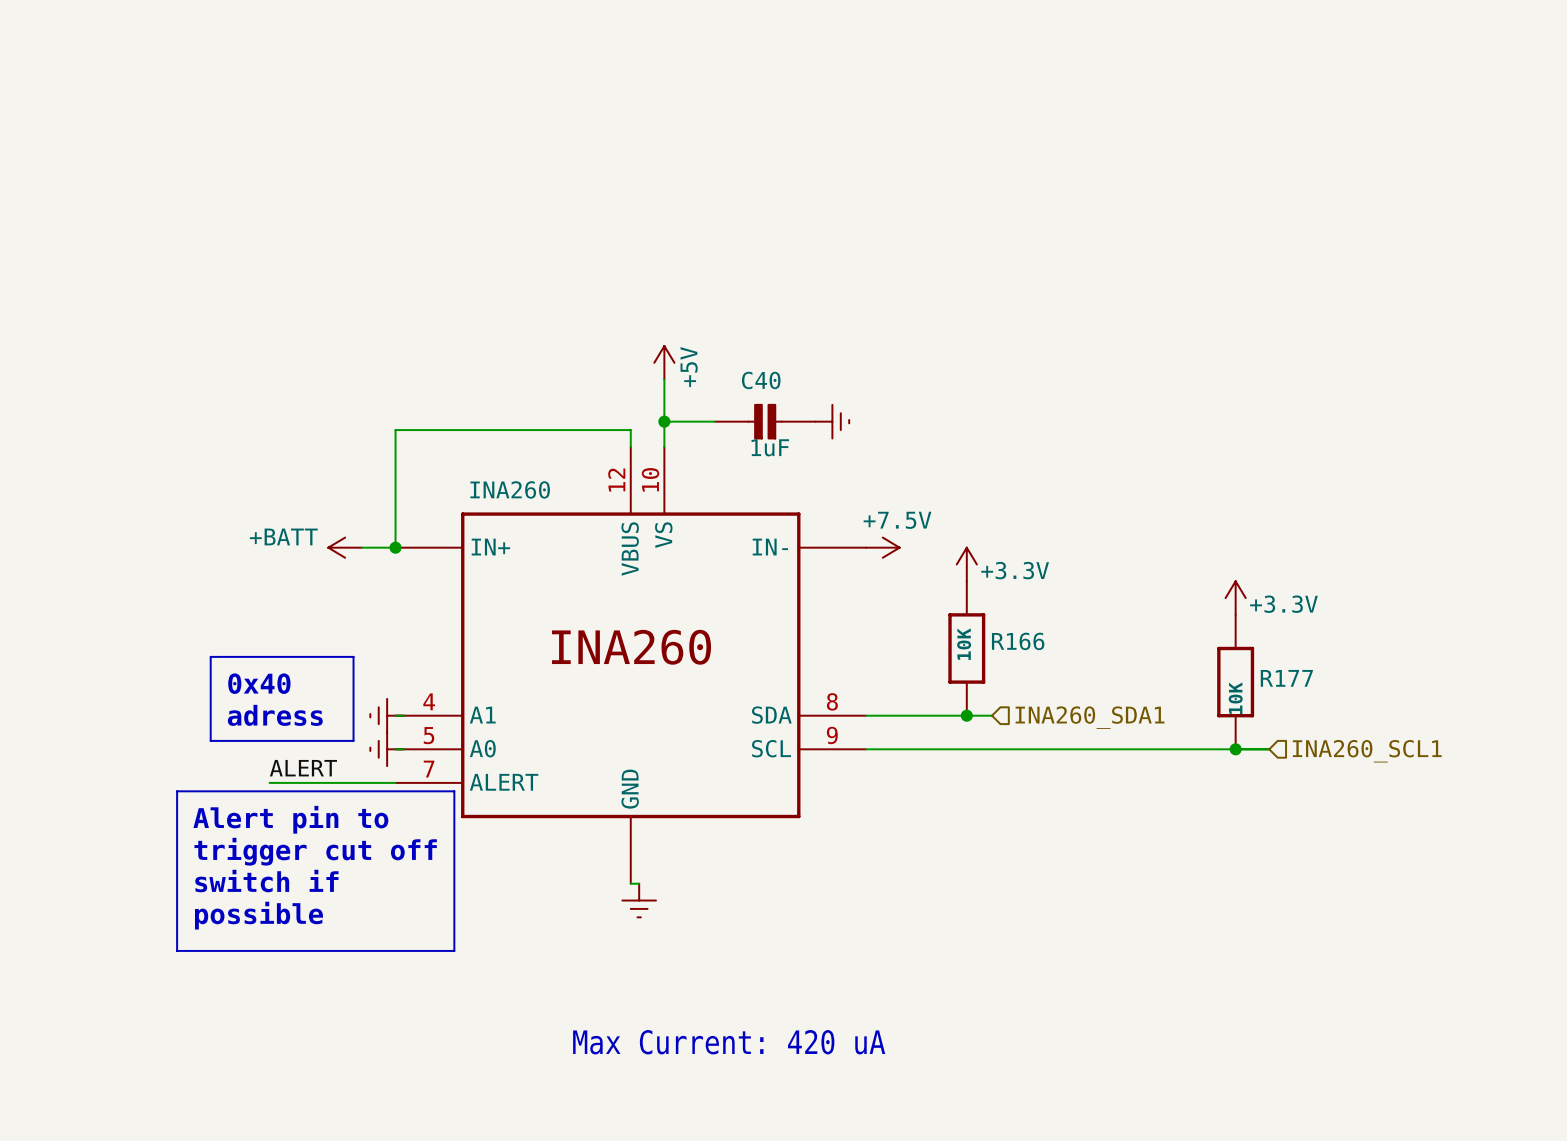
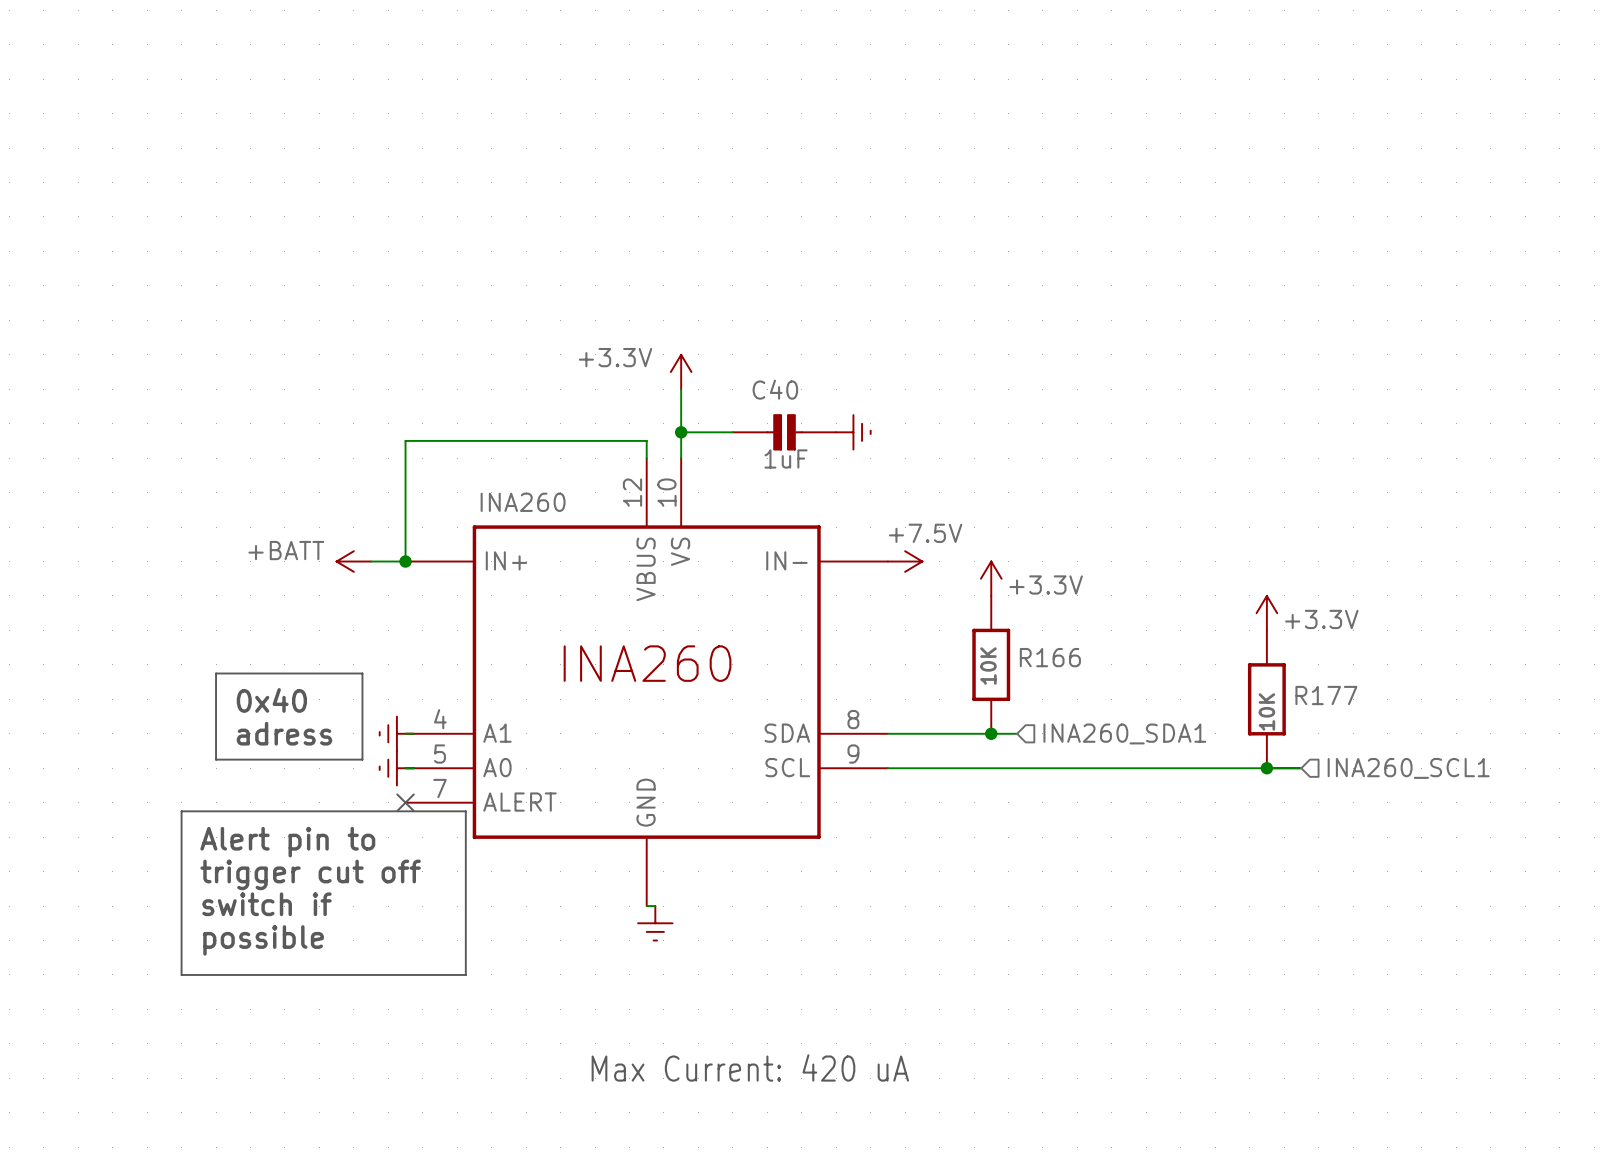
power symbol: +5V (664, 362) -> +3.3V (681, 372)
label: ALERT (303, 768) -> none
wire: (269, 782) (395, 782) -> none
no-connect mark: none -> (405, 802)

